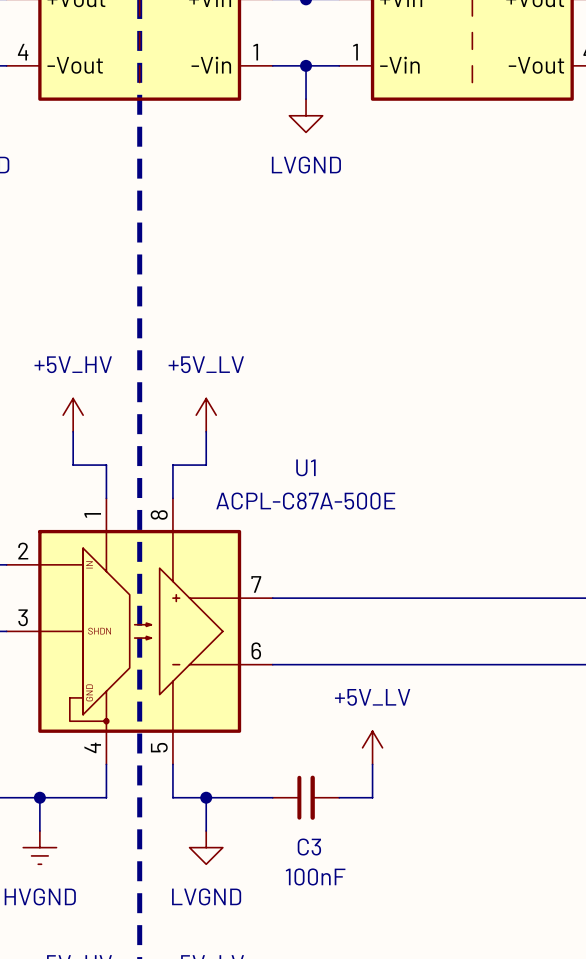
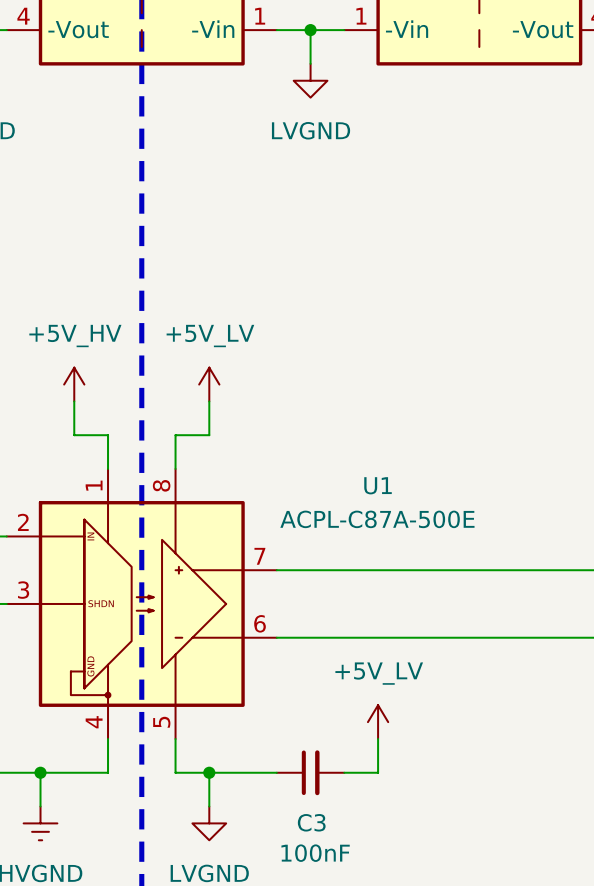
U1 name position: U1 (305, 467) -> U1 (378, 485)
U1 value position: ACPL-C87A-500E (305, 501) -> ACPL-C87A-500E (377, 519)

